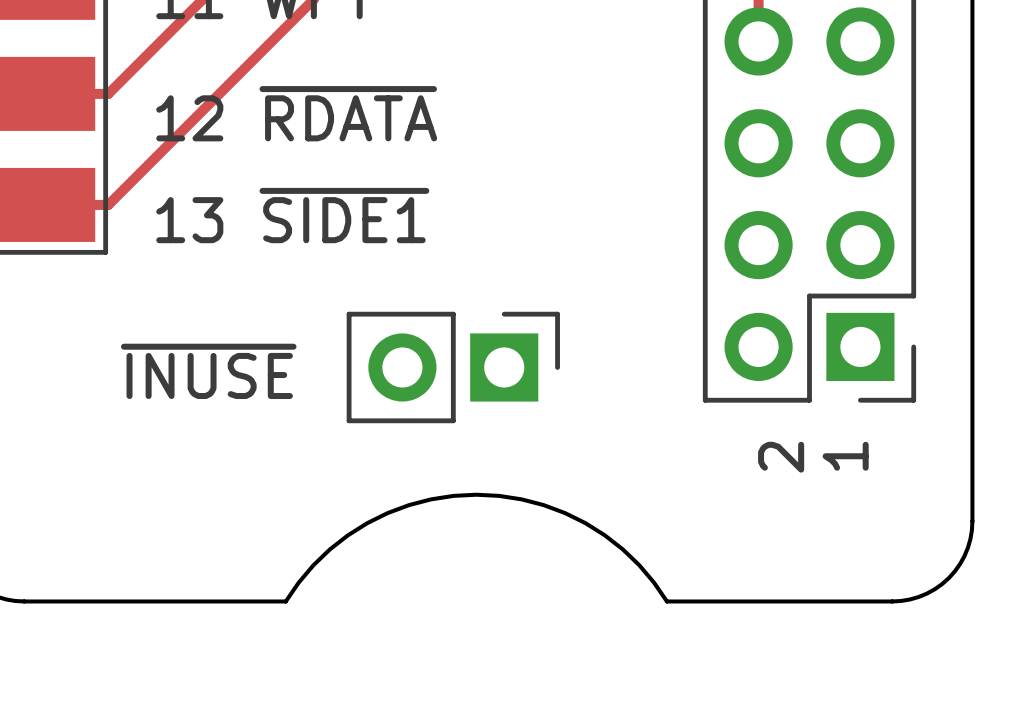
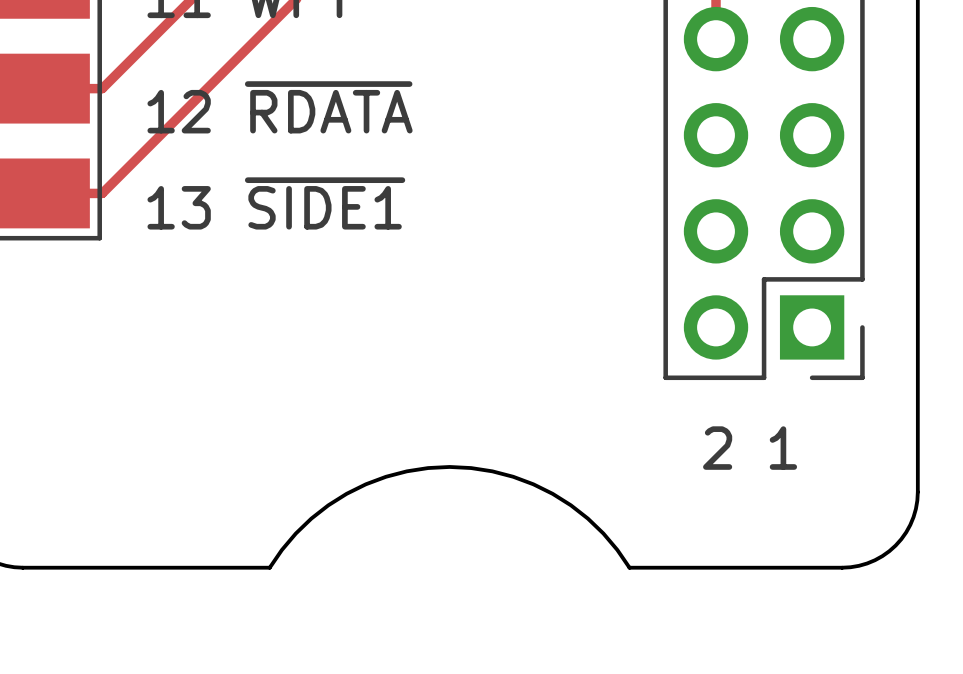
part: ~{INUSE} (453, 367) -> none
text: 1 (845, 456) -> none
text: 2 (781, 457) -> none
text: none -> 2 1 (750, 448)

